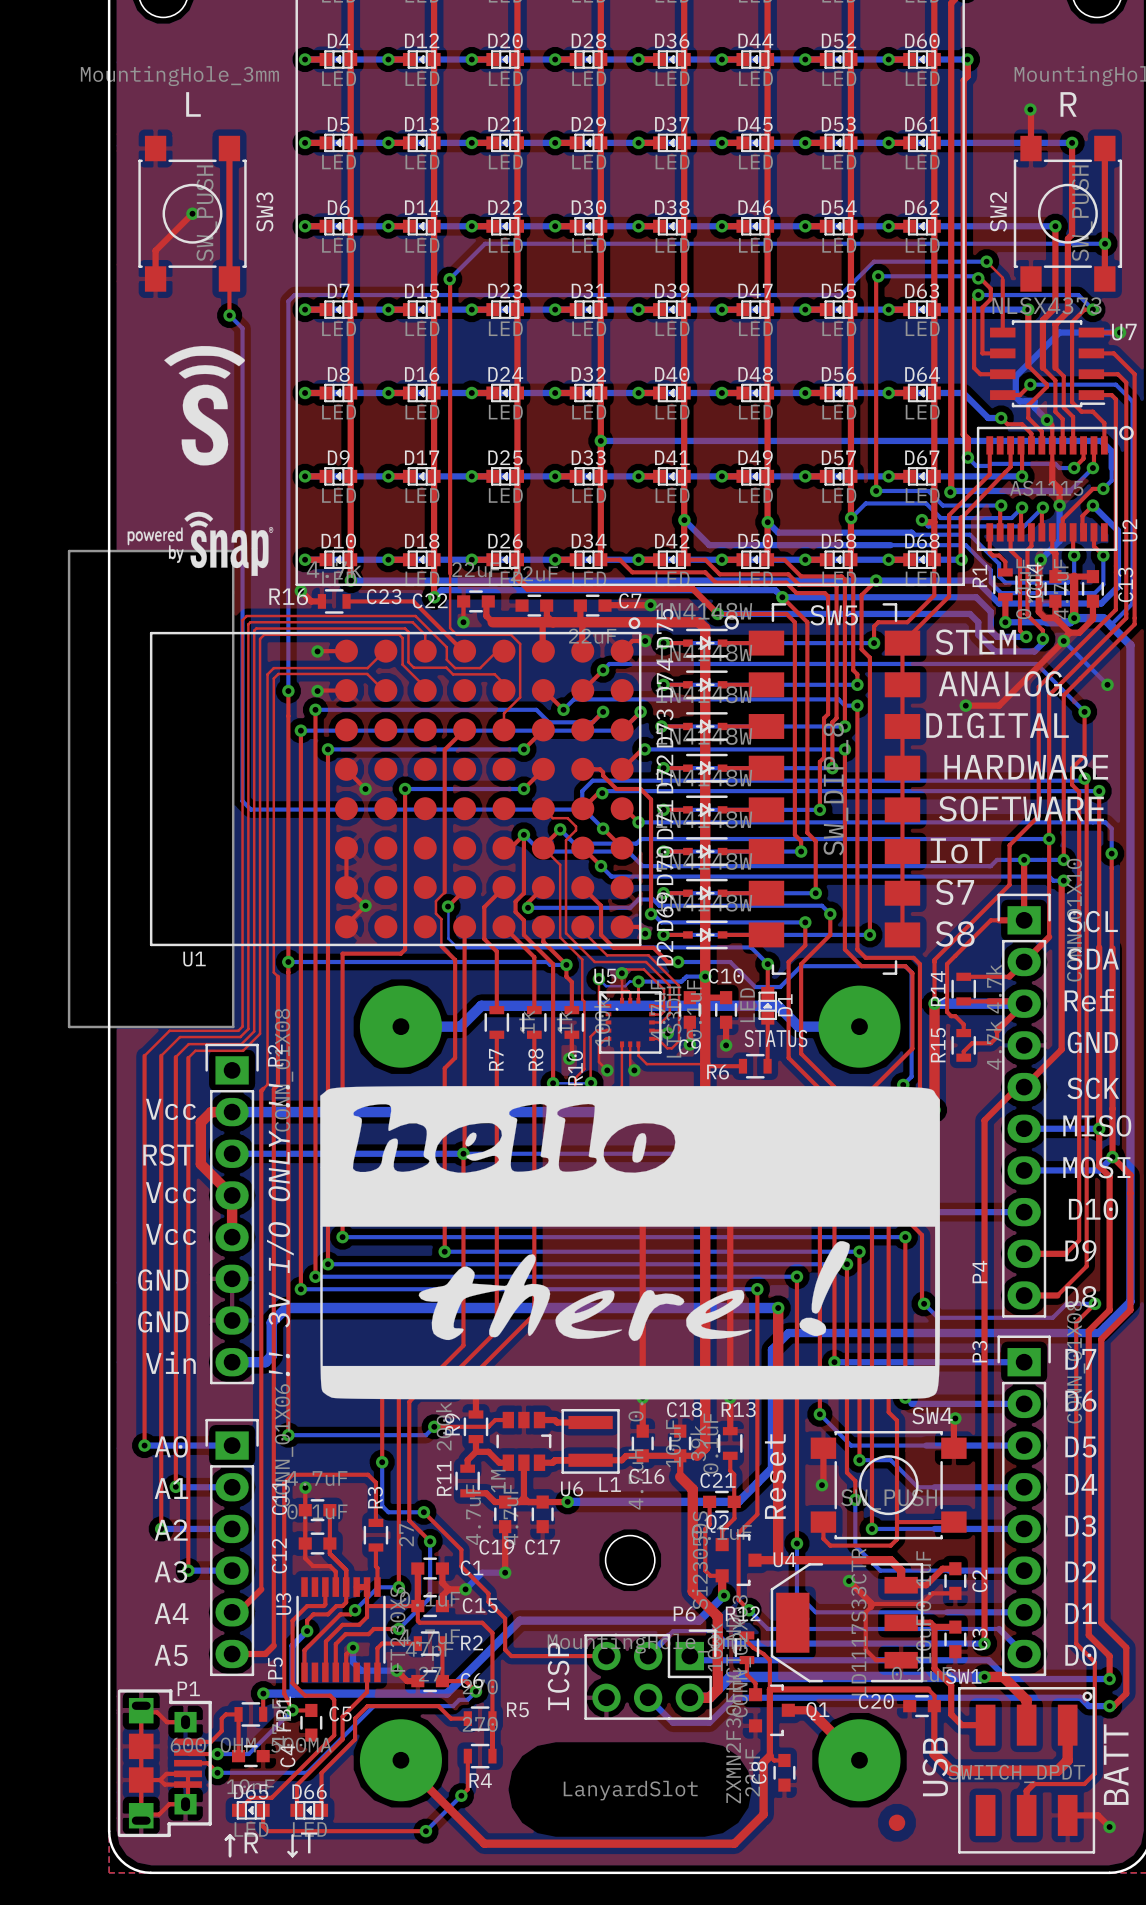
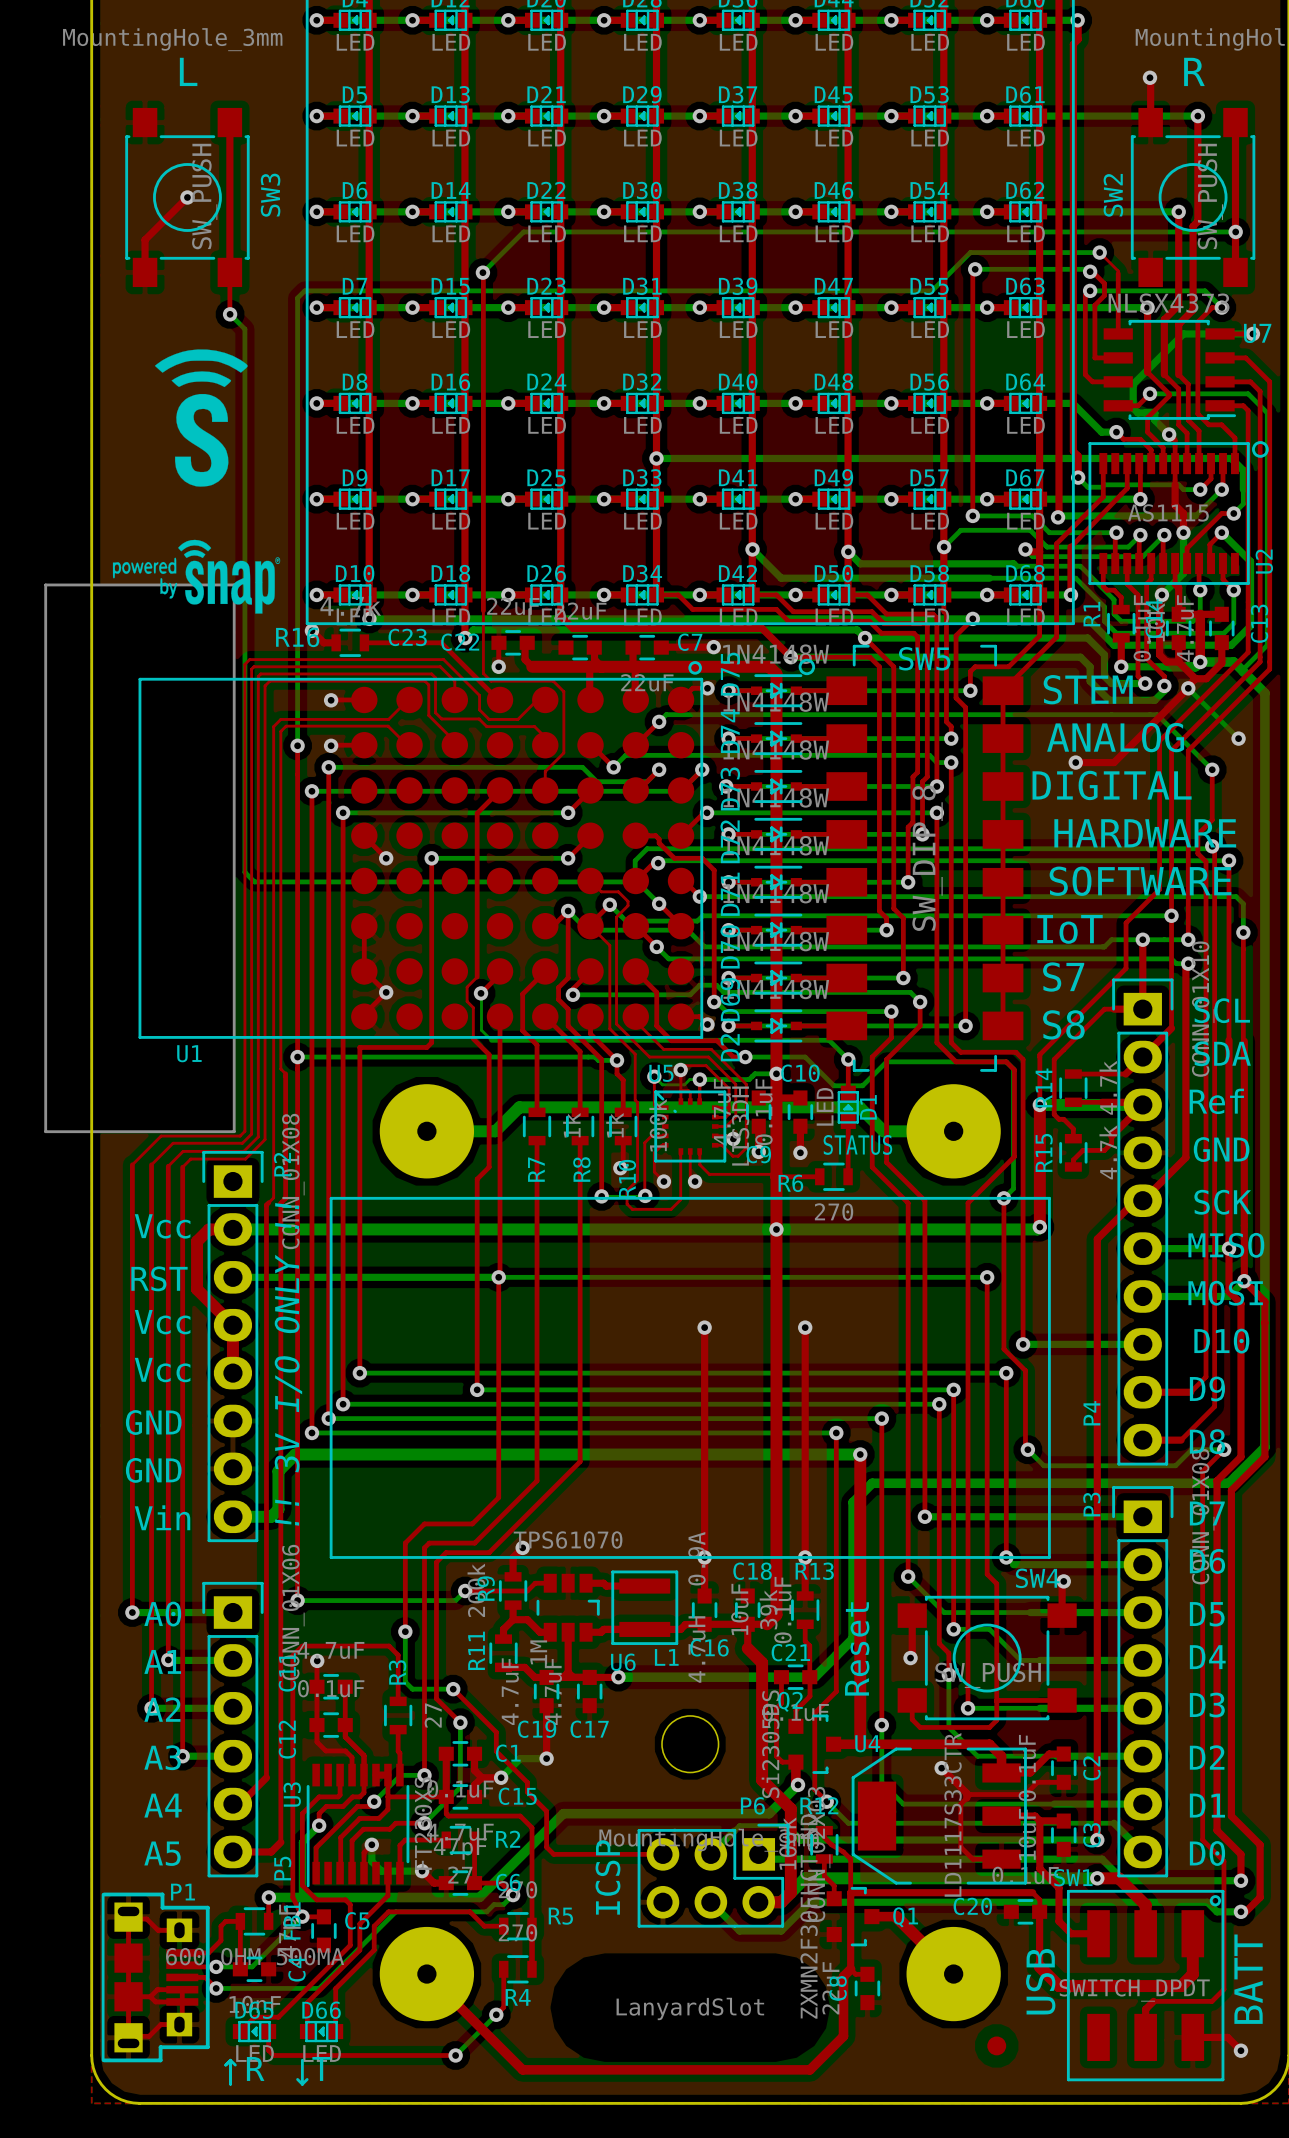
line: none -> (331, 1198) (331, 1557) (1049, 1557) (1049, 1198) (331, 1198)
drawing: [320, 1086, 941, 1400] -> none

